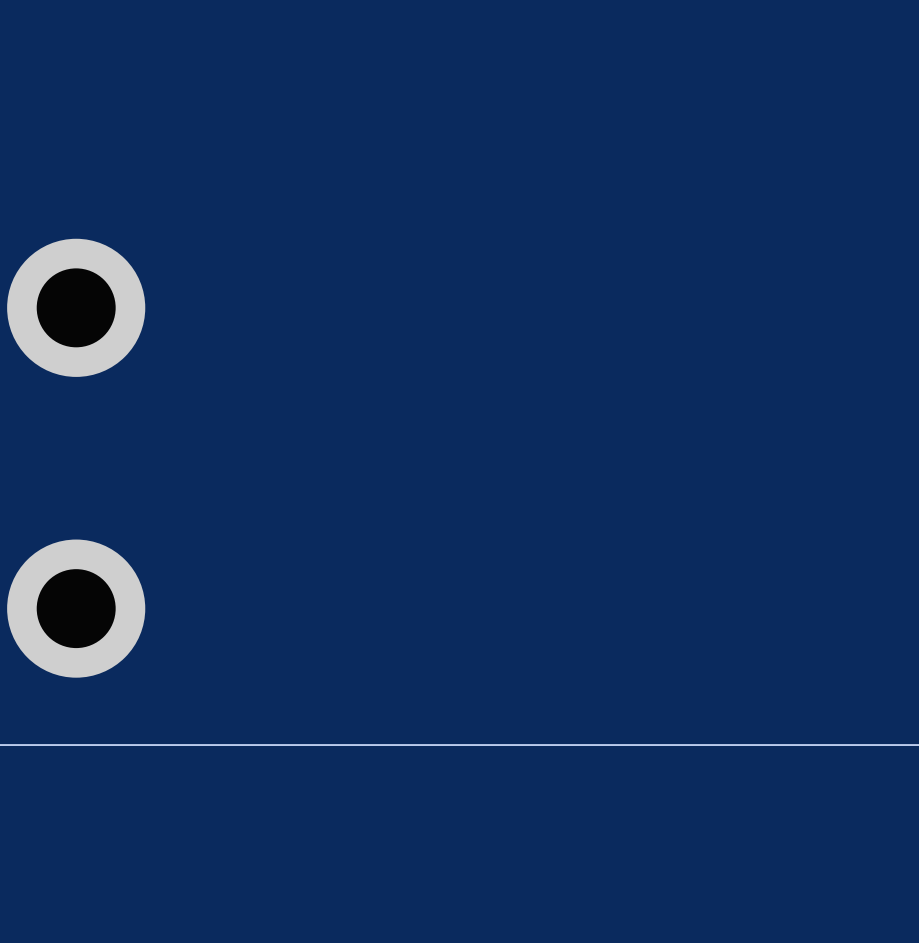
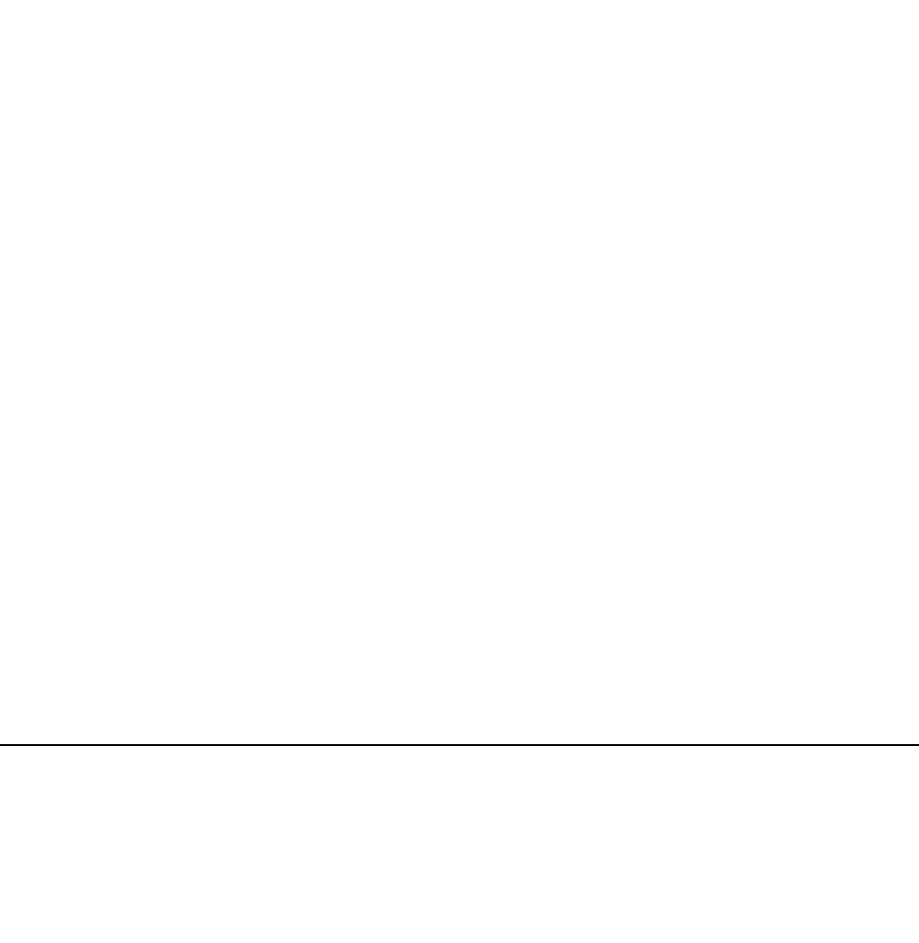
part: (76, 307) -> none
part: (76, 608) -> none

